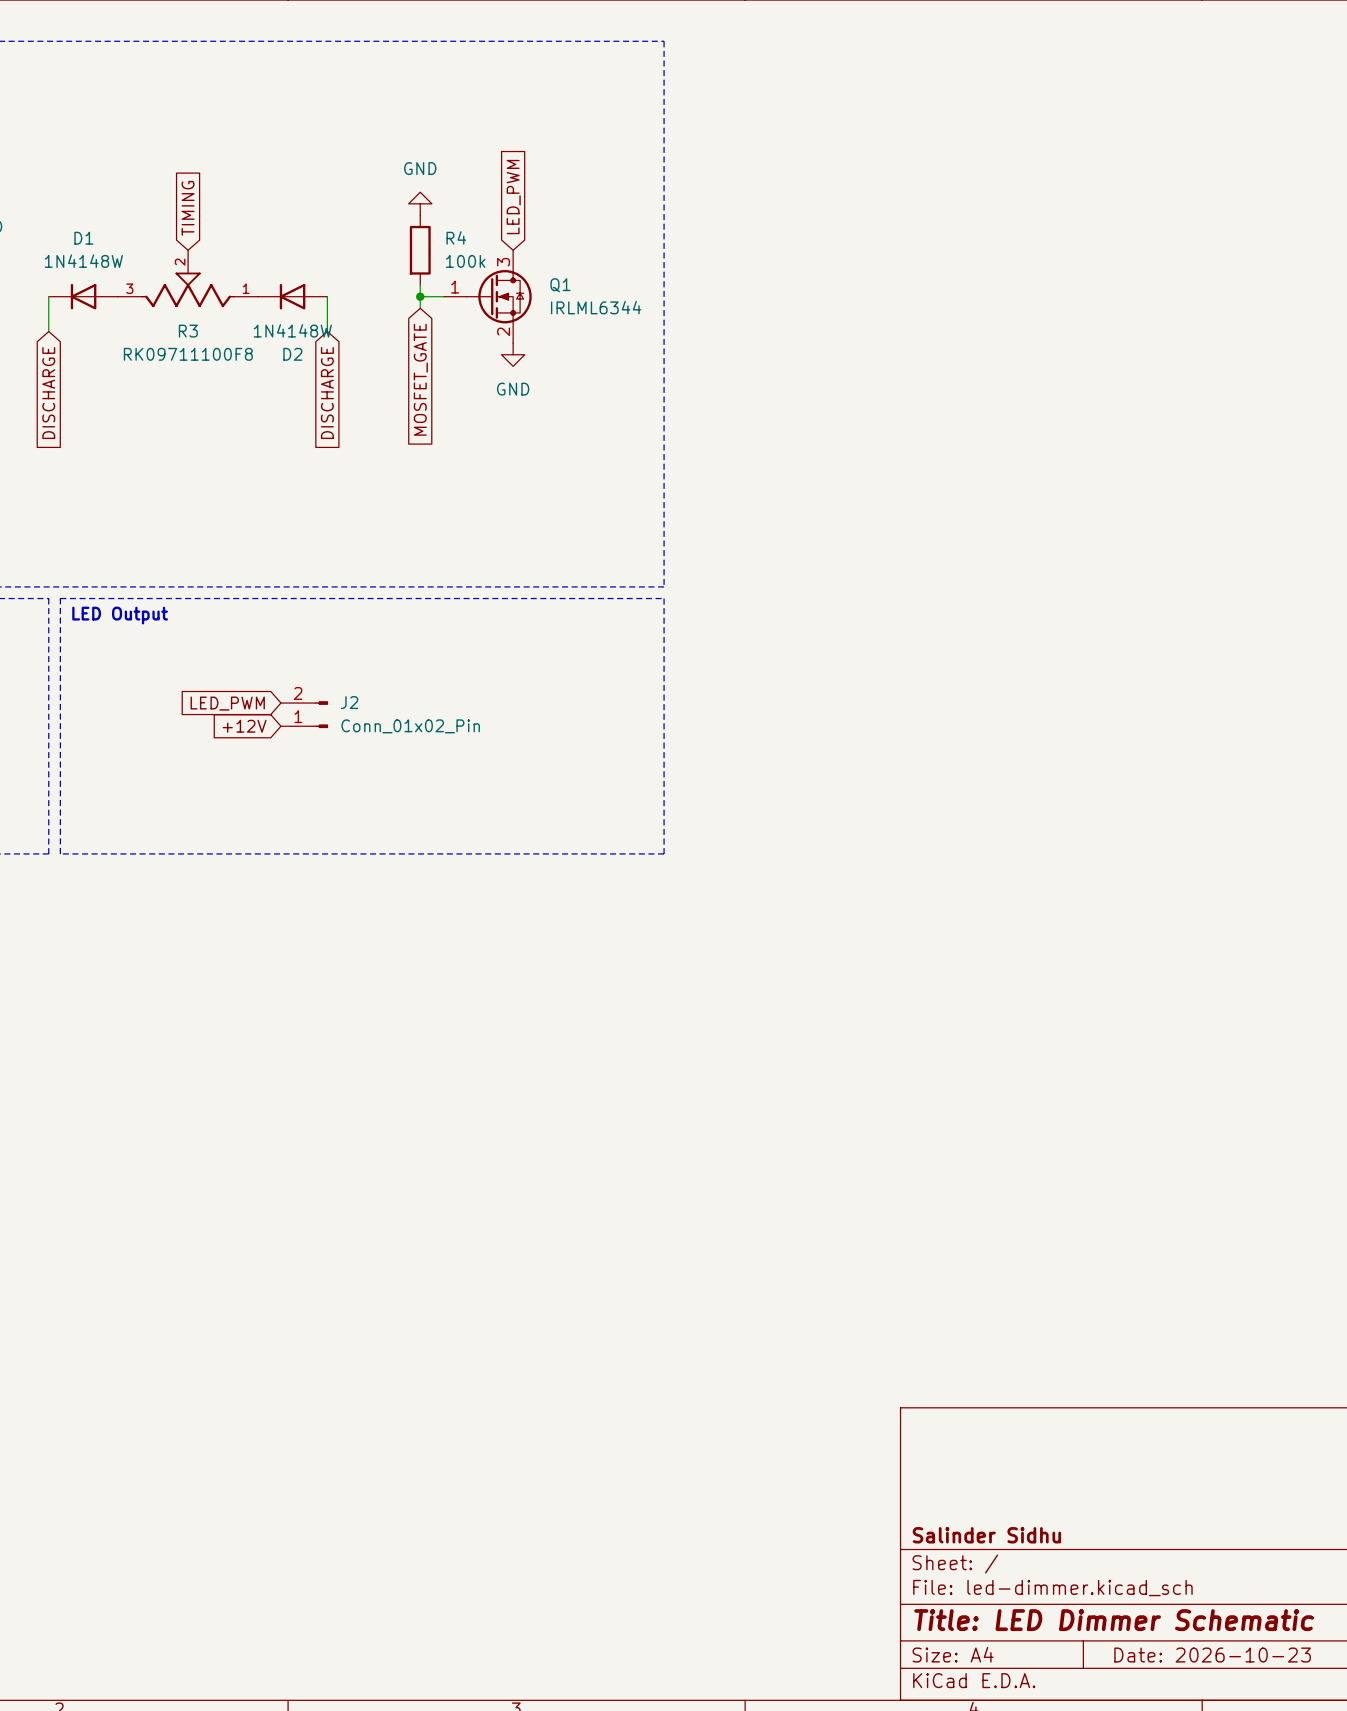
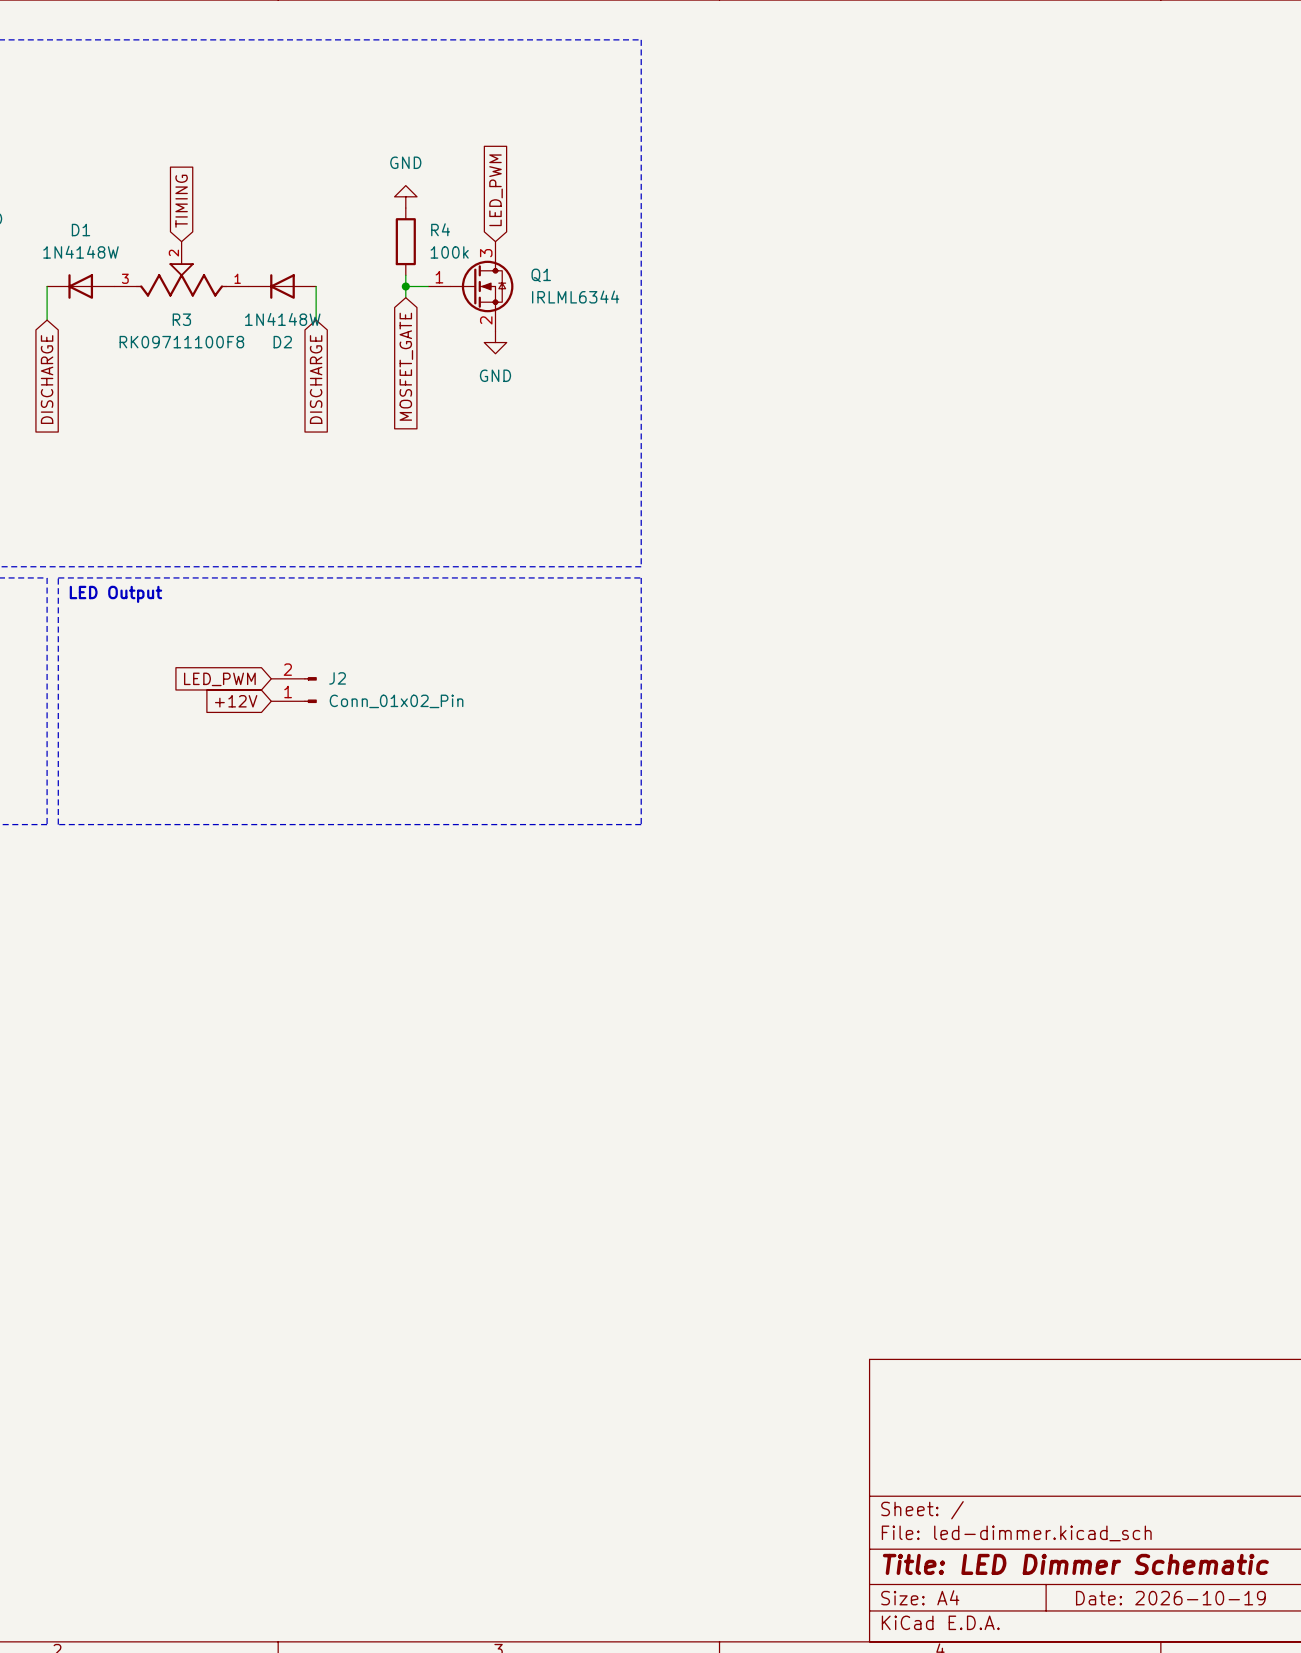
title block: Salinder Sidhu (986, 1535) -> none
title block: Date: 2026-10-23 (1212, 1655) -> Date: 2026-10-19 (1170, 1598)

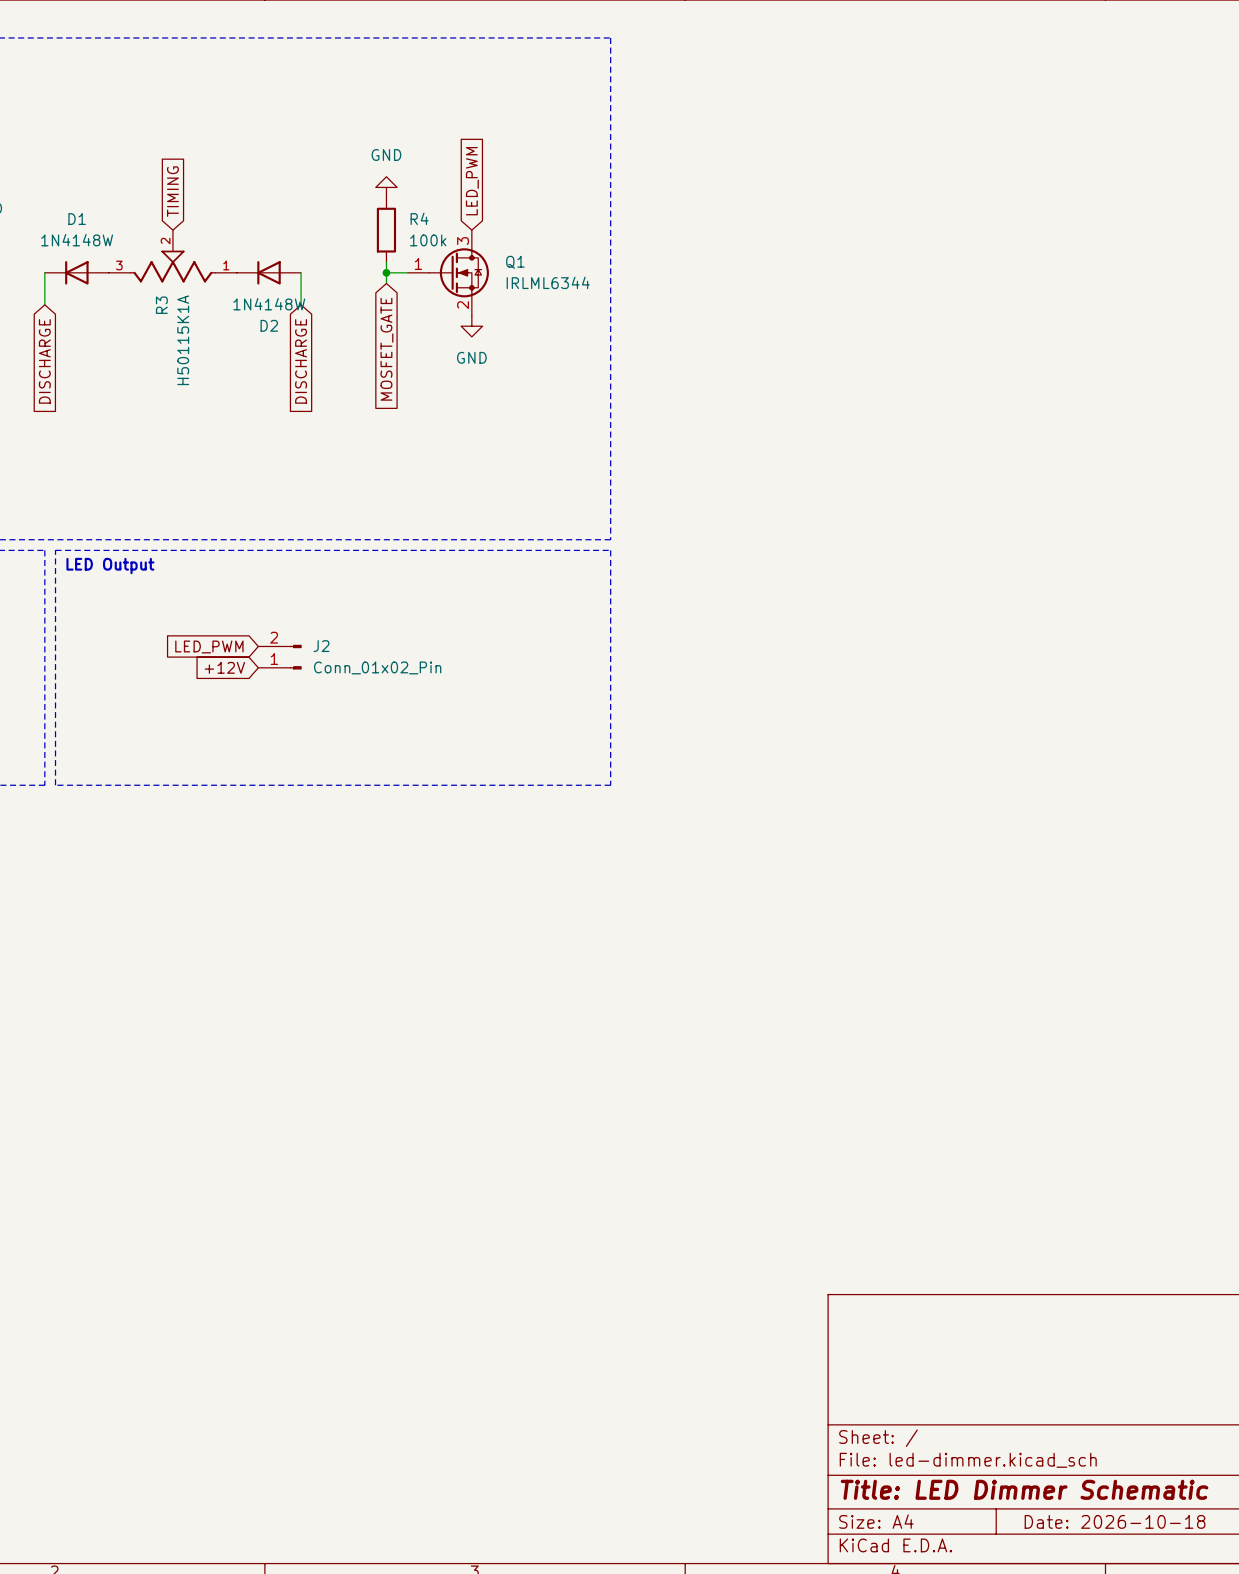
R3 name rotation: 0° (181, 319) -> 90° counterclockwise (161, 305)
R3 value: RK09711100F8 (181, 342) -> H50115K1A (183, 340)
title block: Date: 2026-10-19 (1170, 1598) -> Date: 2026-10-18 (1115, 1521)

